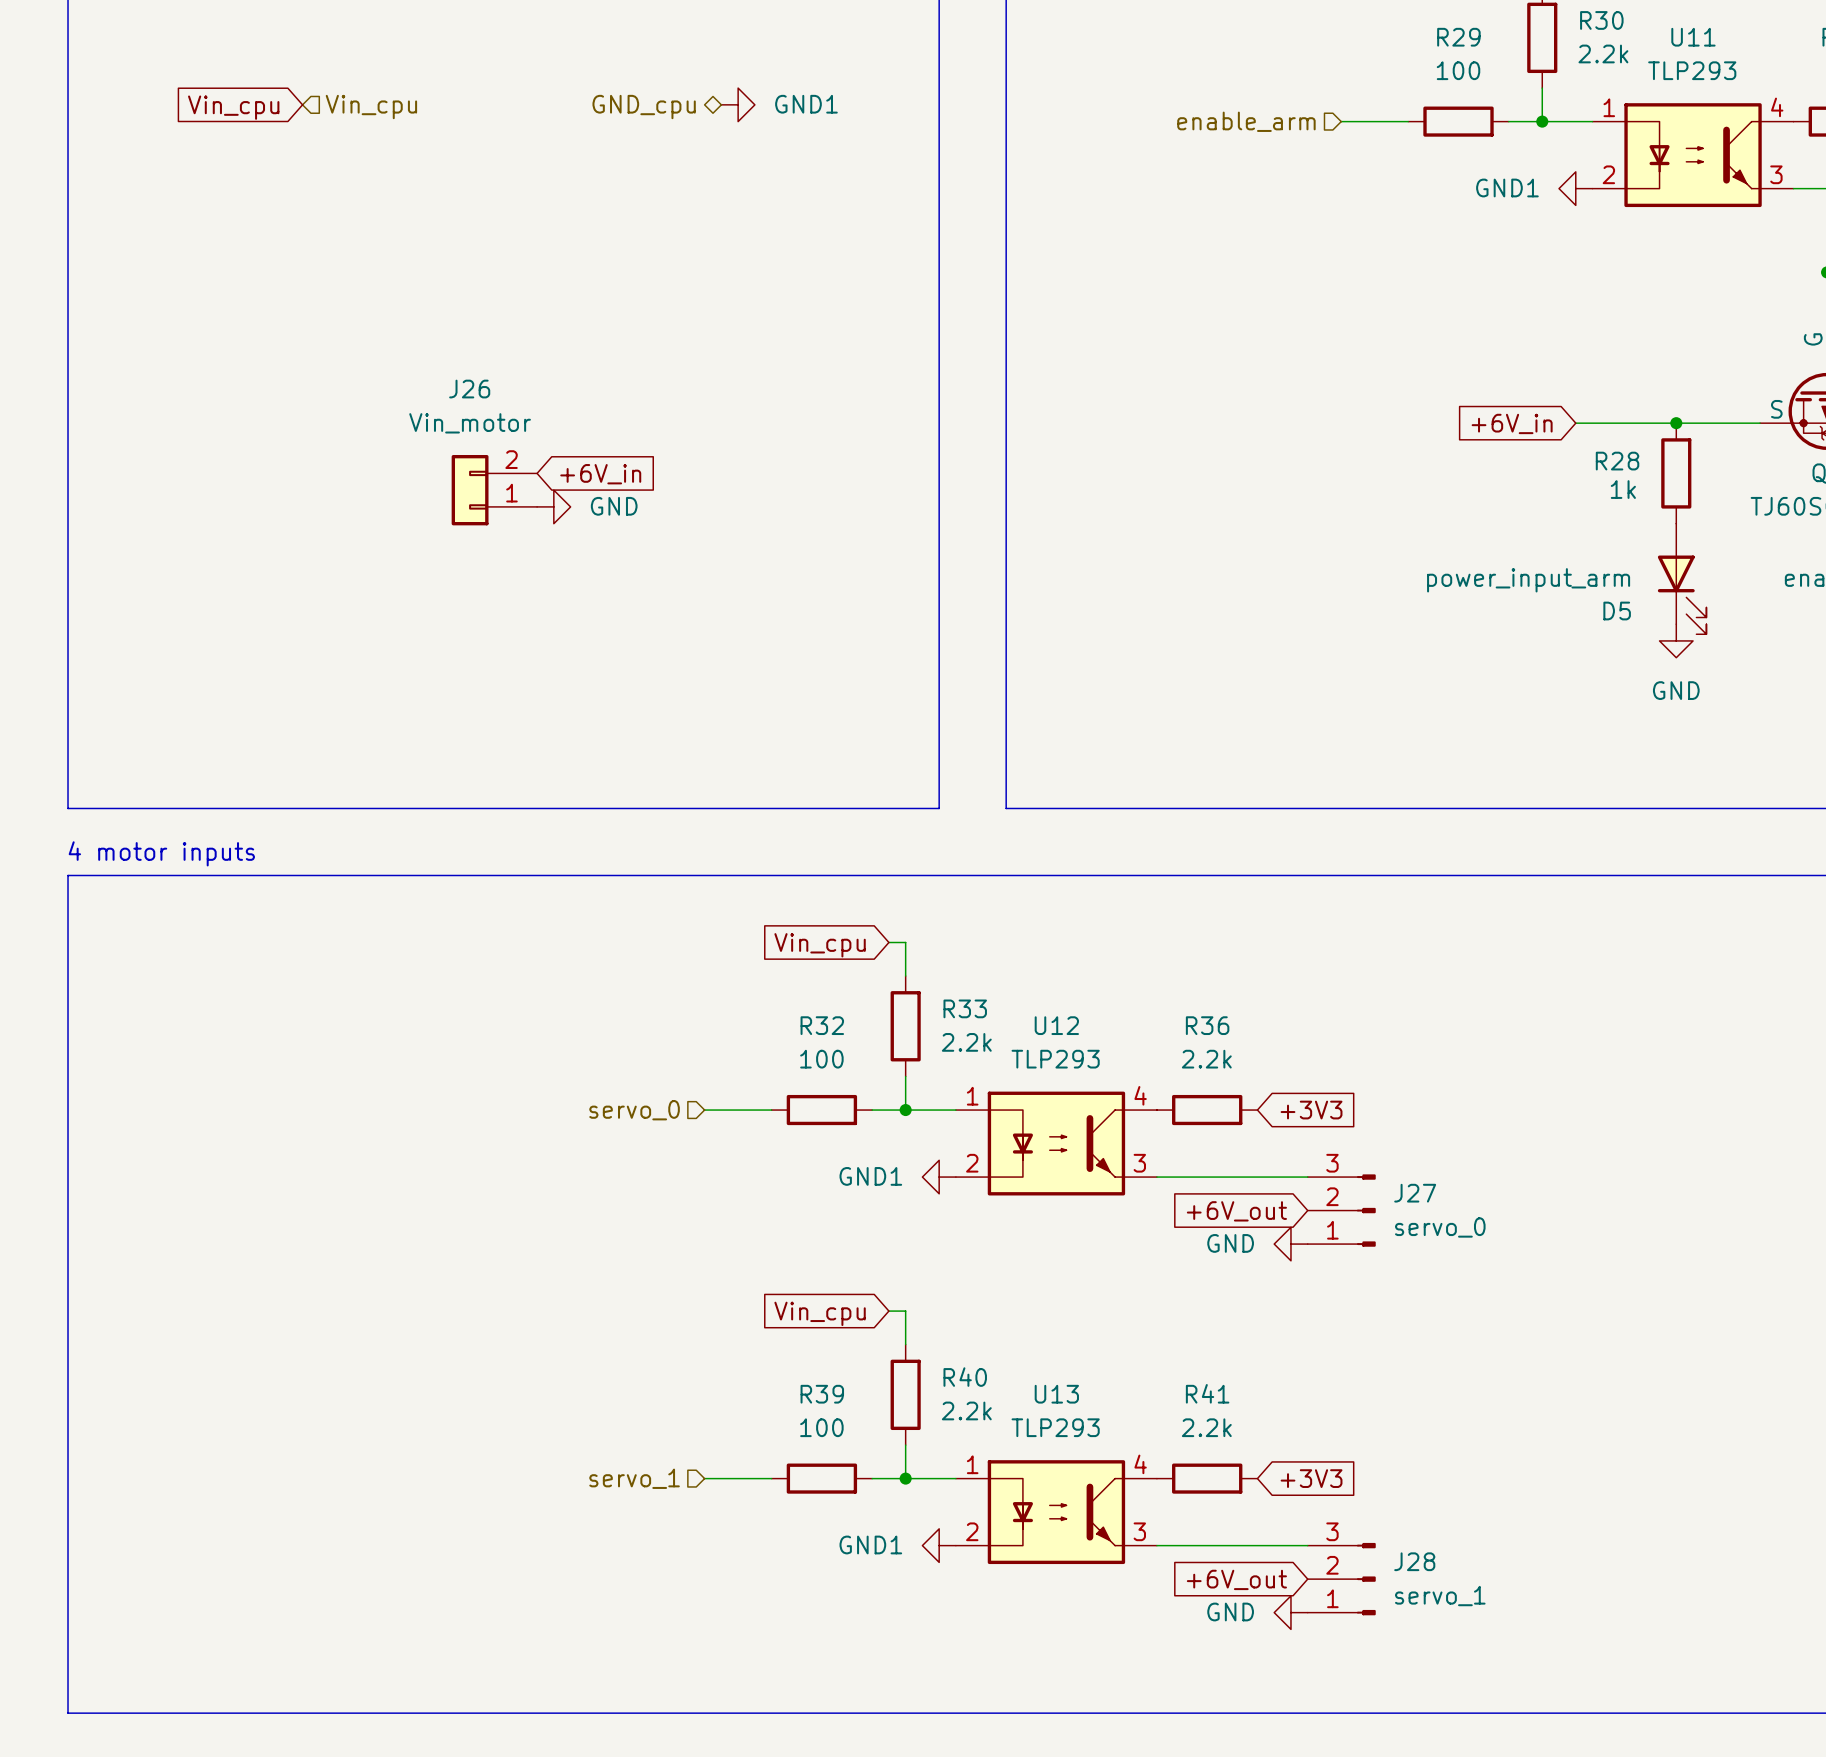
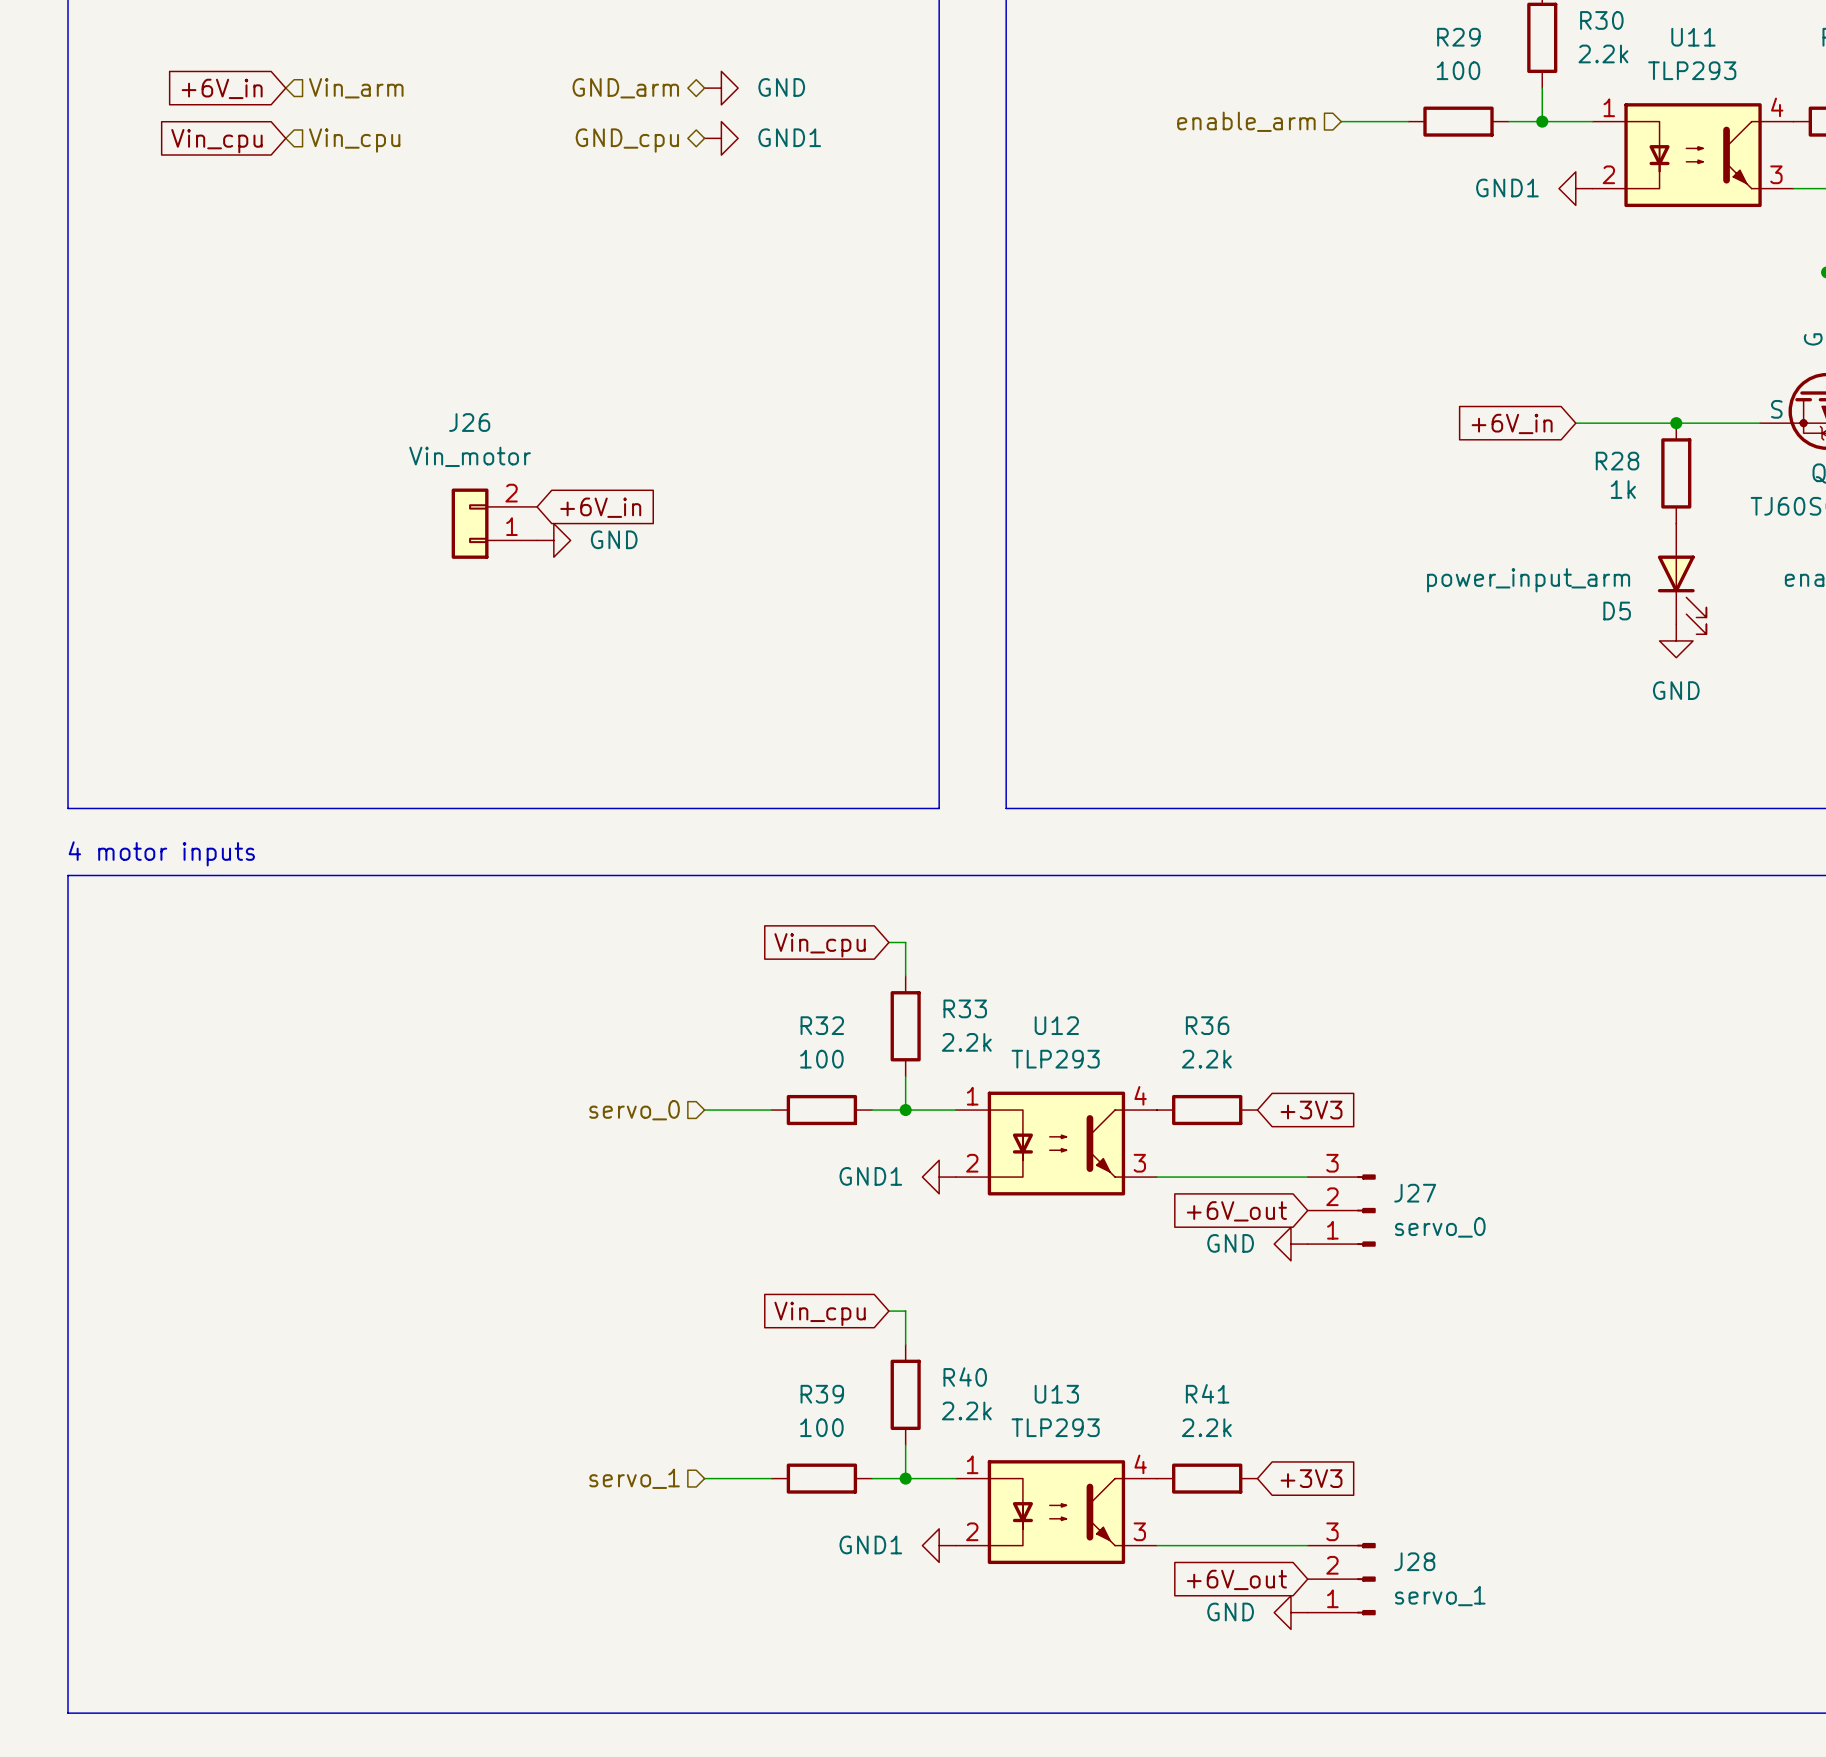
global label: none -> +6V_in (222, 88)
hierarchical label: none -> Vin_arm (356, 88)
hierarchical label: none -> GND_arm (625, 88)
power symbol: none -> GND (721, 88)
power symbol position: GND1 (738, 104) -> GND1 (721, 138)
global label position: Vin_cpu (233, 107) -> Vin_cpu (216, 141)
hierarchical label position: Vin_cpu (371, 107) -> Vin_cpu (354, 140)
hierarchical label position: GND_cpu (644, 107) -> GND_cpu (627, 140)
global label position: +6V_in (600, 474) -> +6V_in (600, 507)
J26 position: (494, 490) -> (494, 523)
power symbol position: GND (553, 506) -> GND (553, 540)

